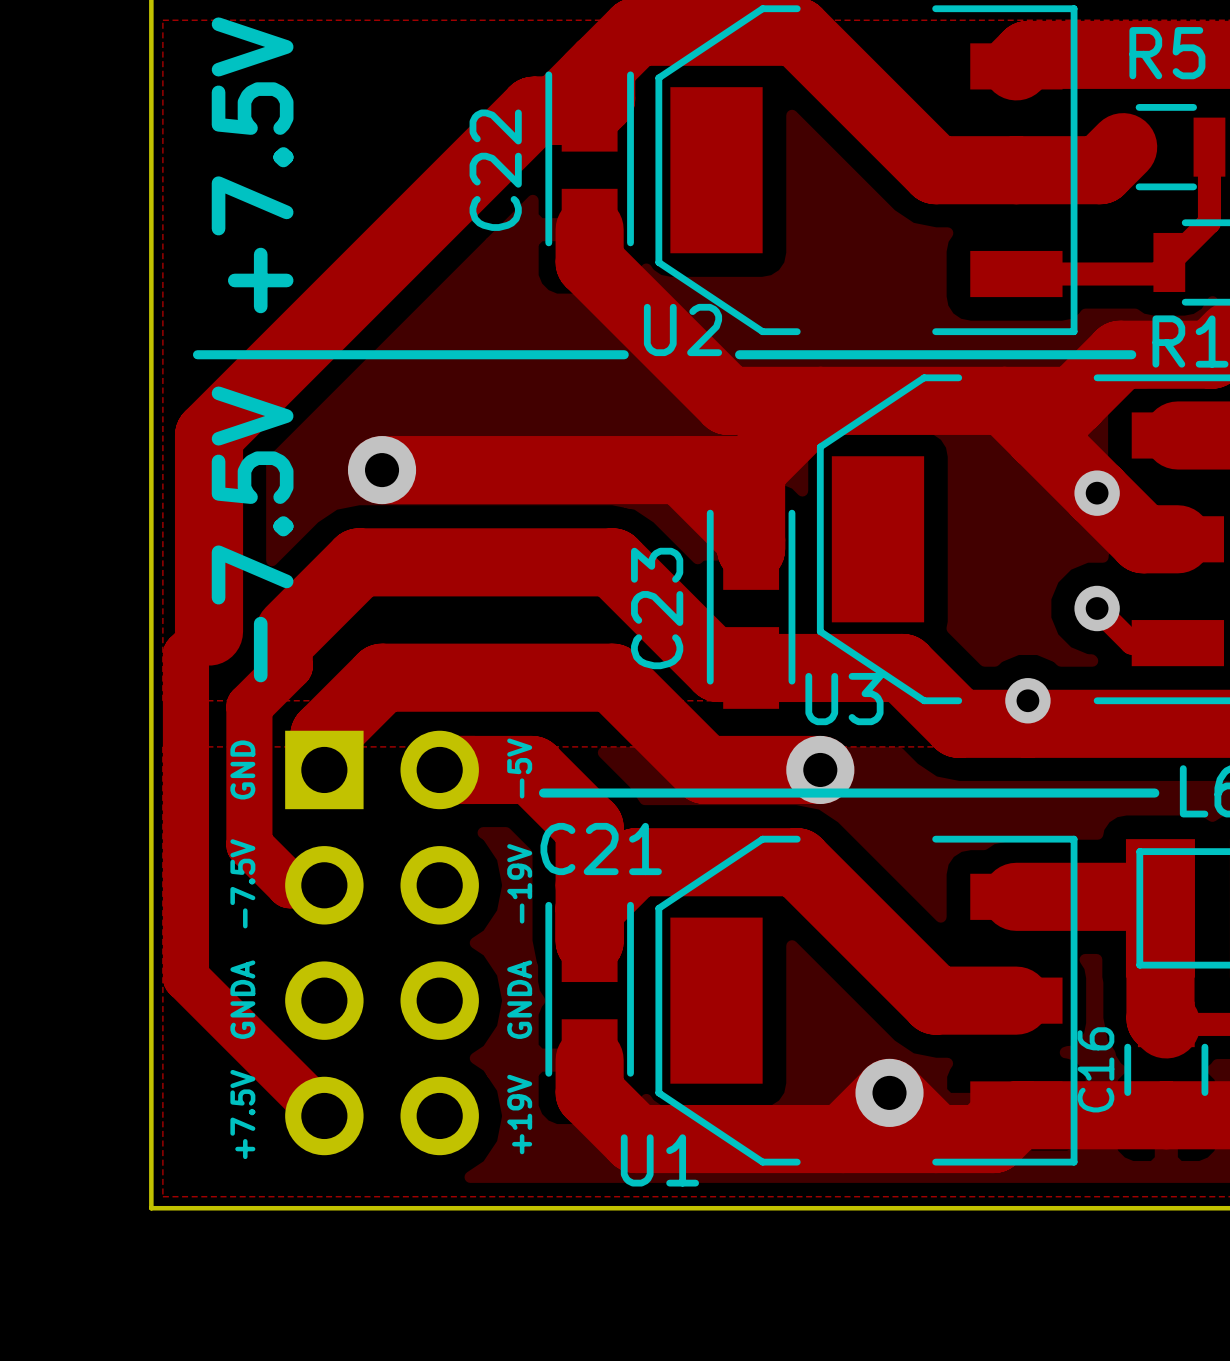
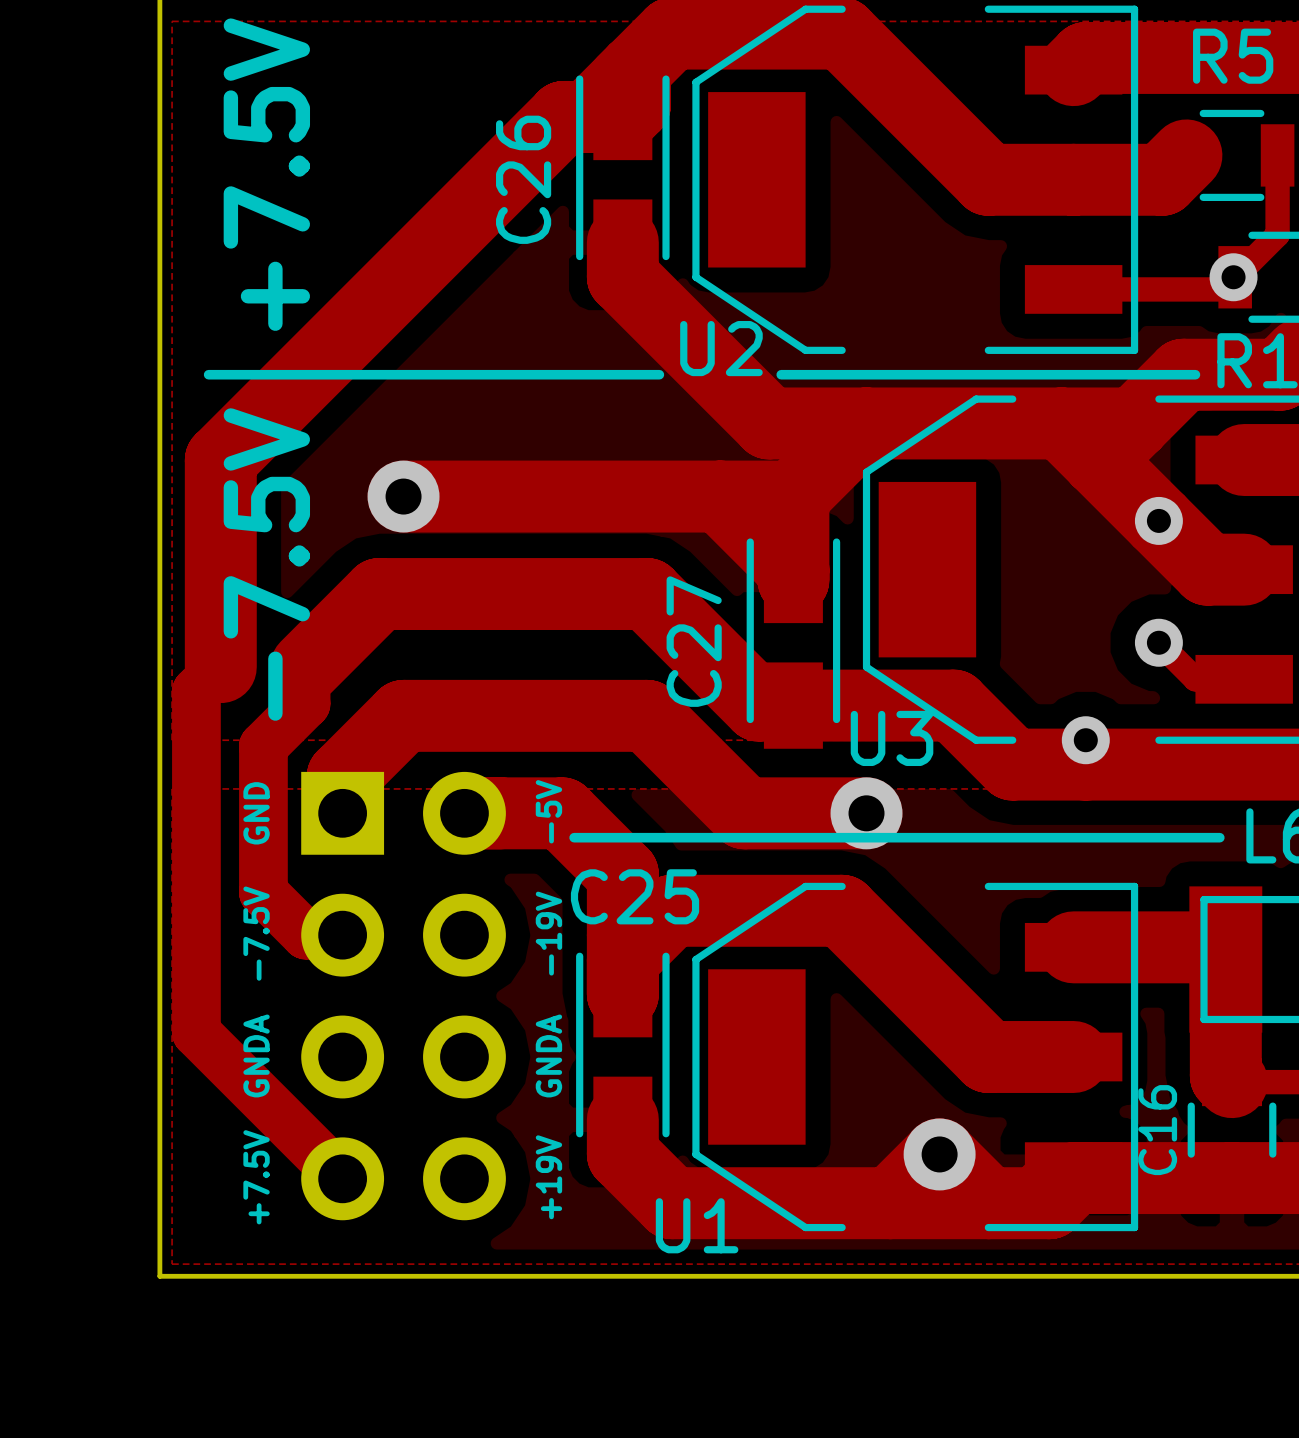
C22 name: C22 (495, 170) -> C26 (523, 179)
via: none -> (1233, 277)
C23 name: C23 (657, 608) -> C27 (694, 641)
C21 name: C21 (601, 849) -> C25 (635, 896)

